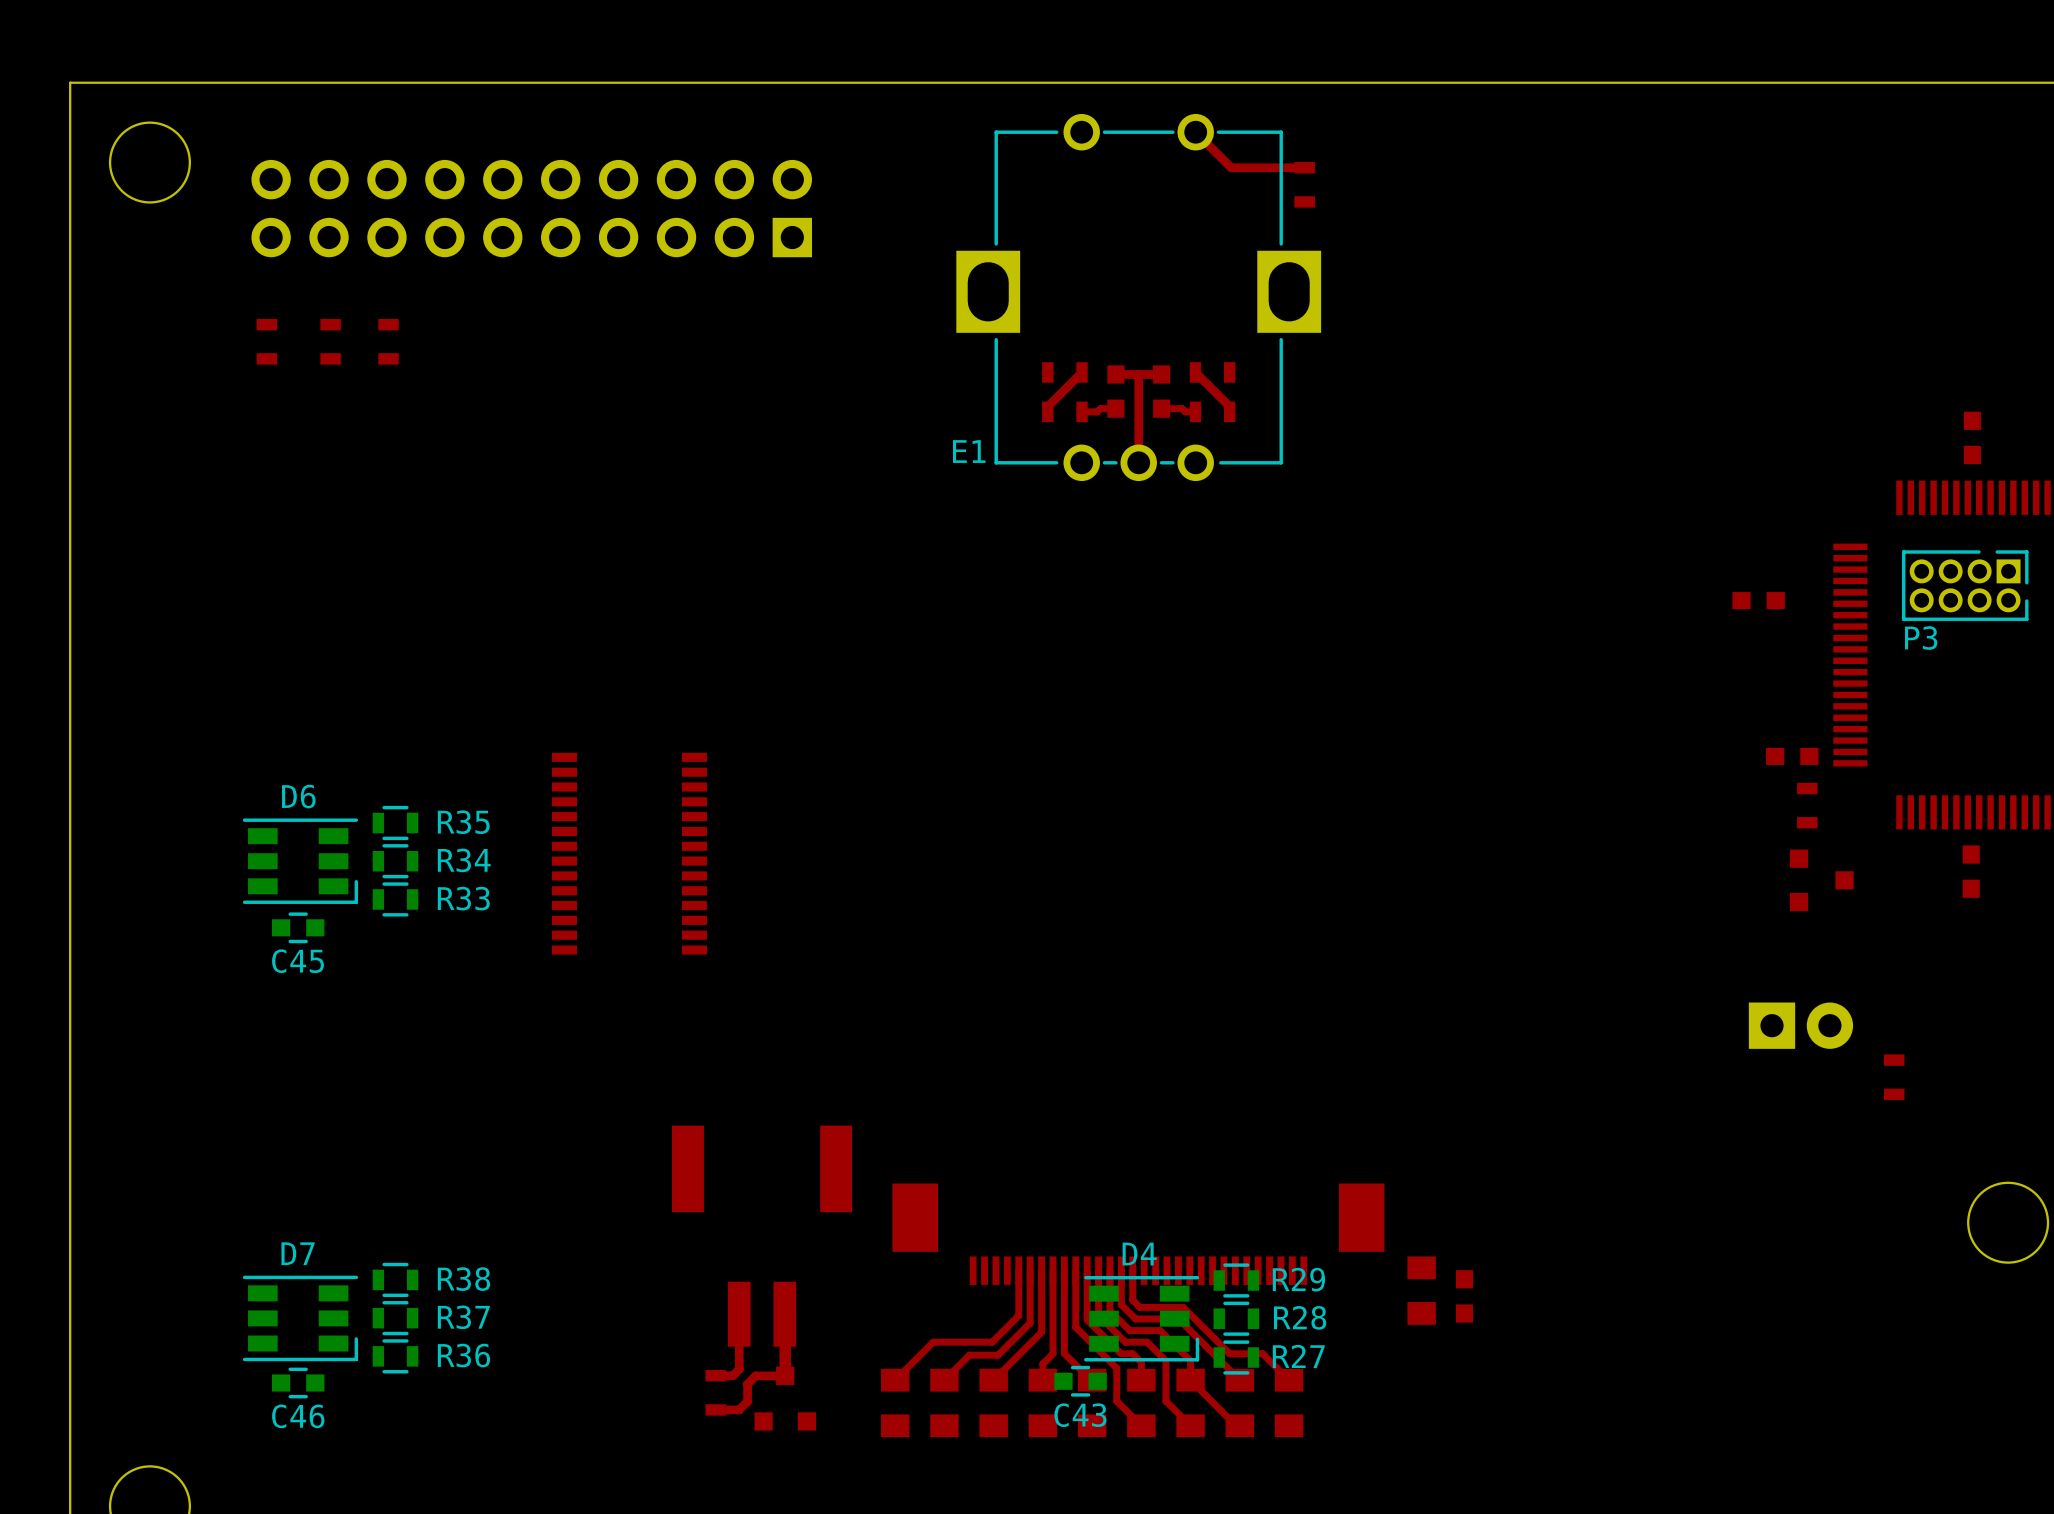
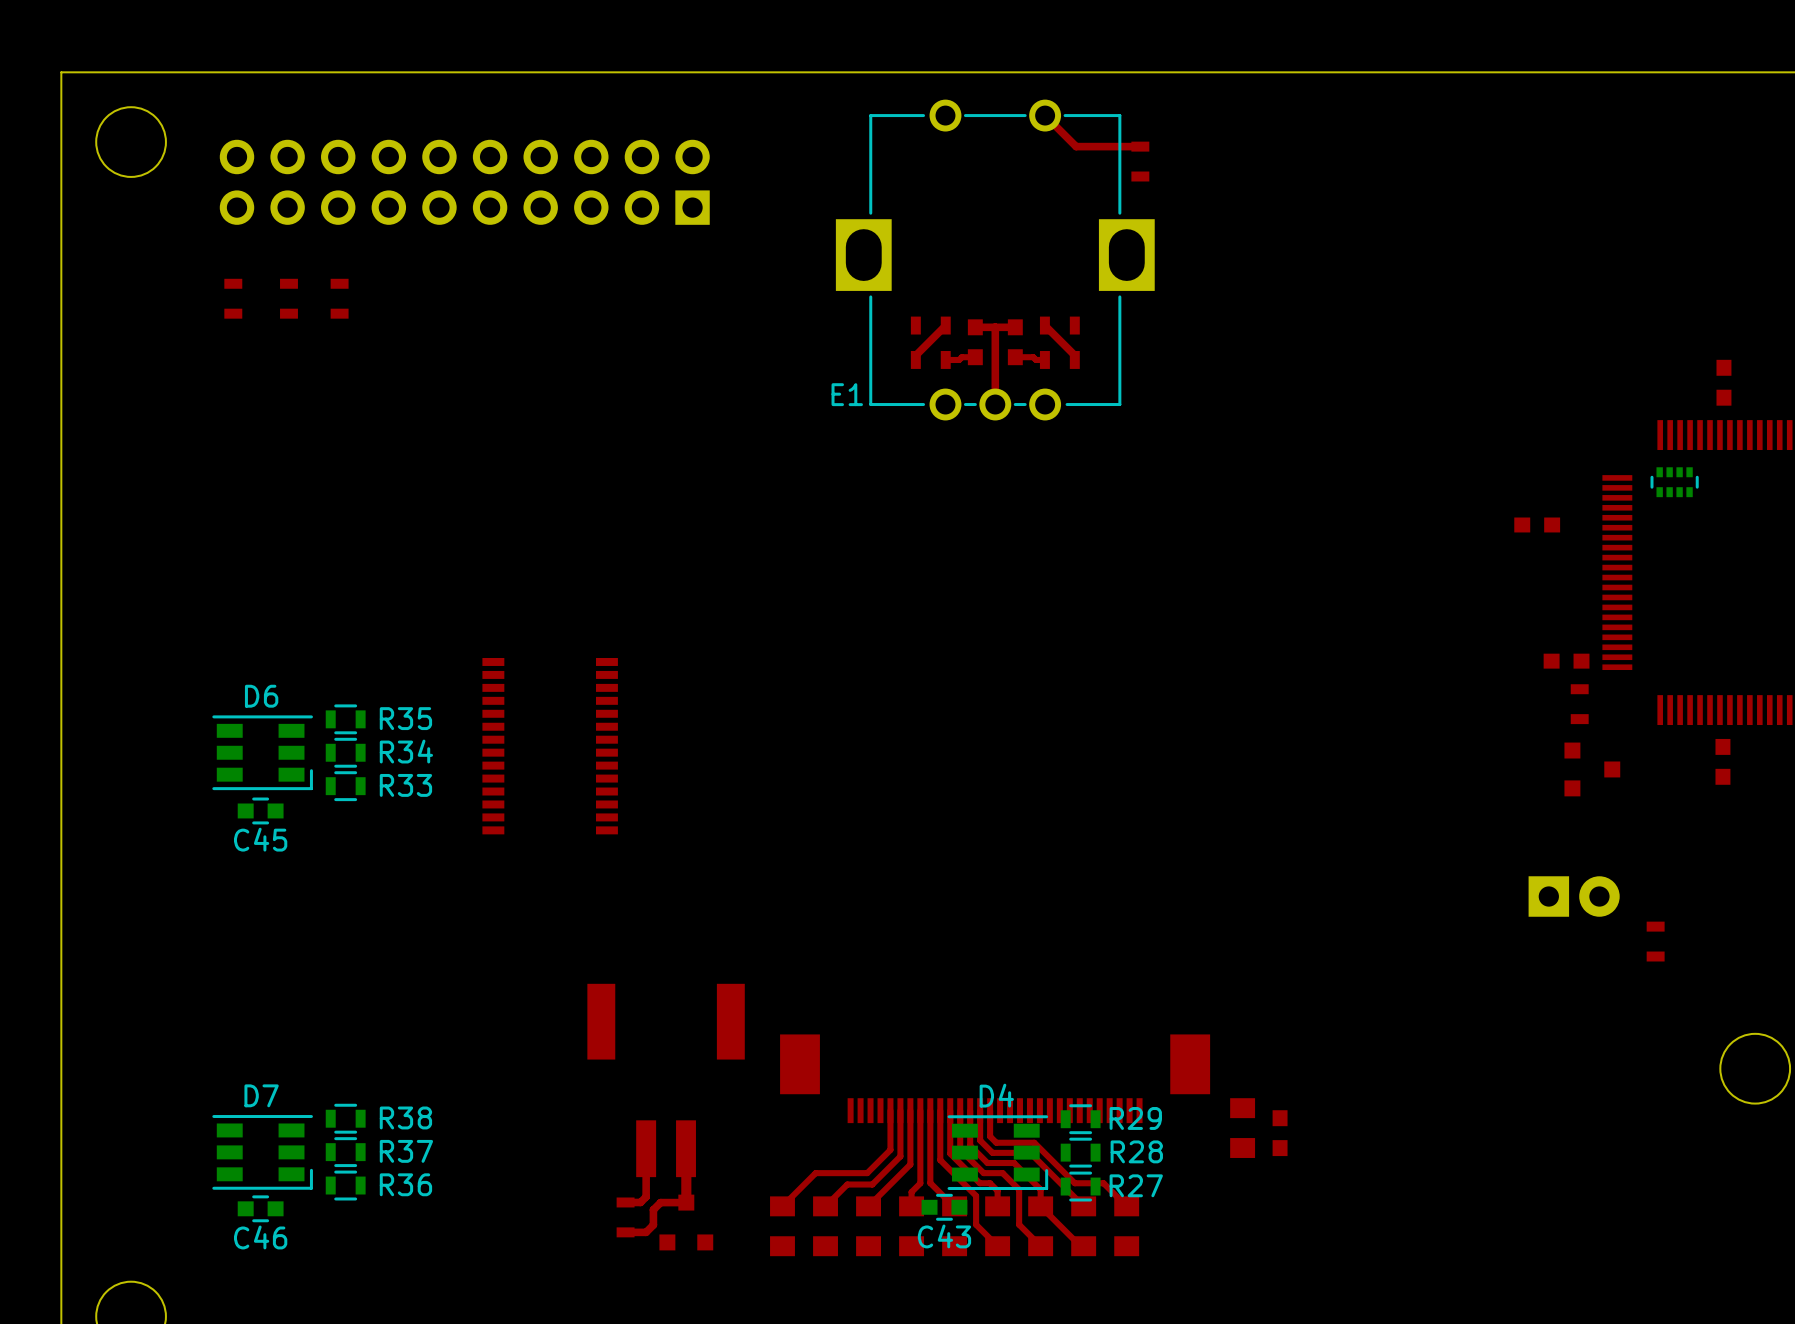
part: none -> (1674, 482)
P3: (1965, 585) -> none

